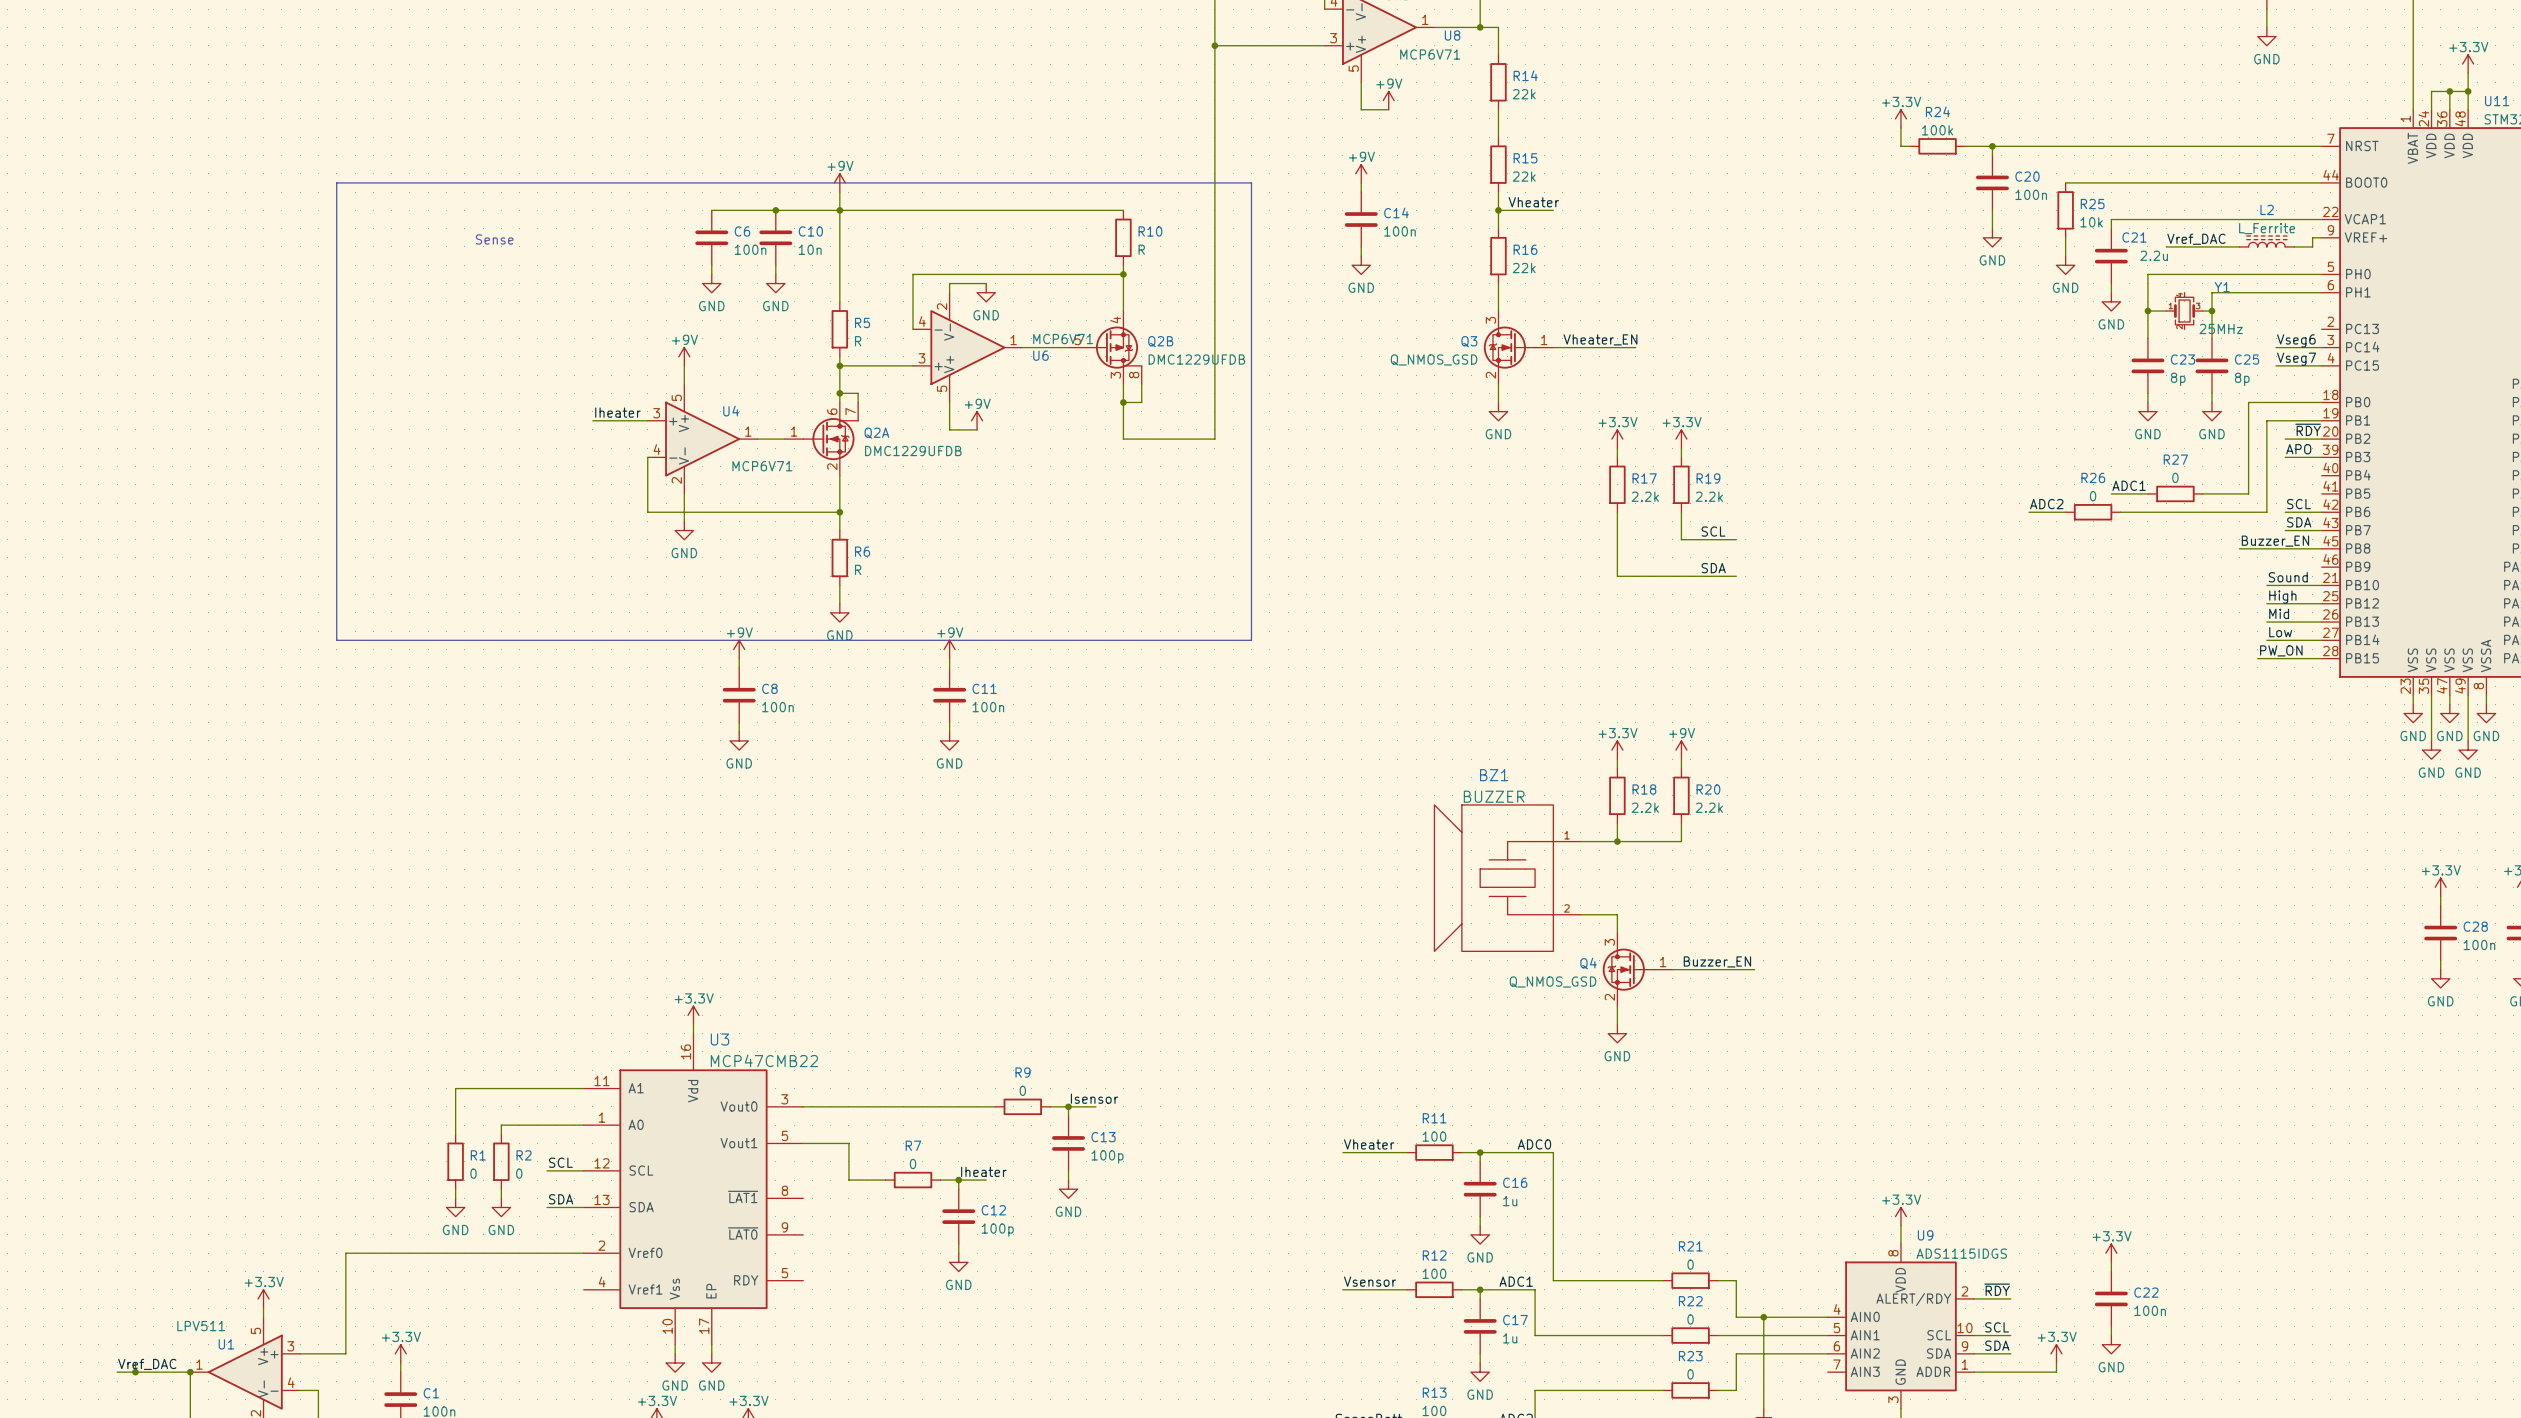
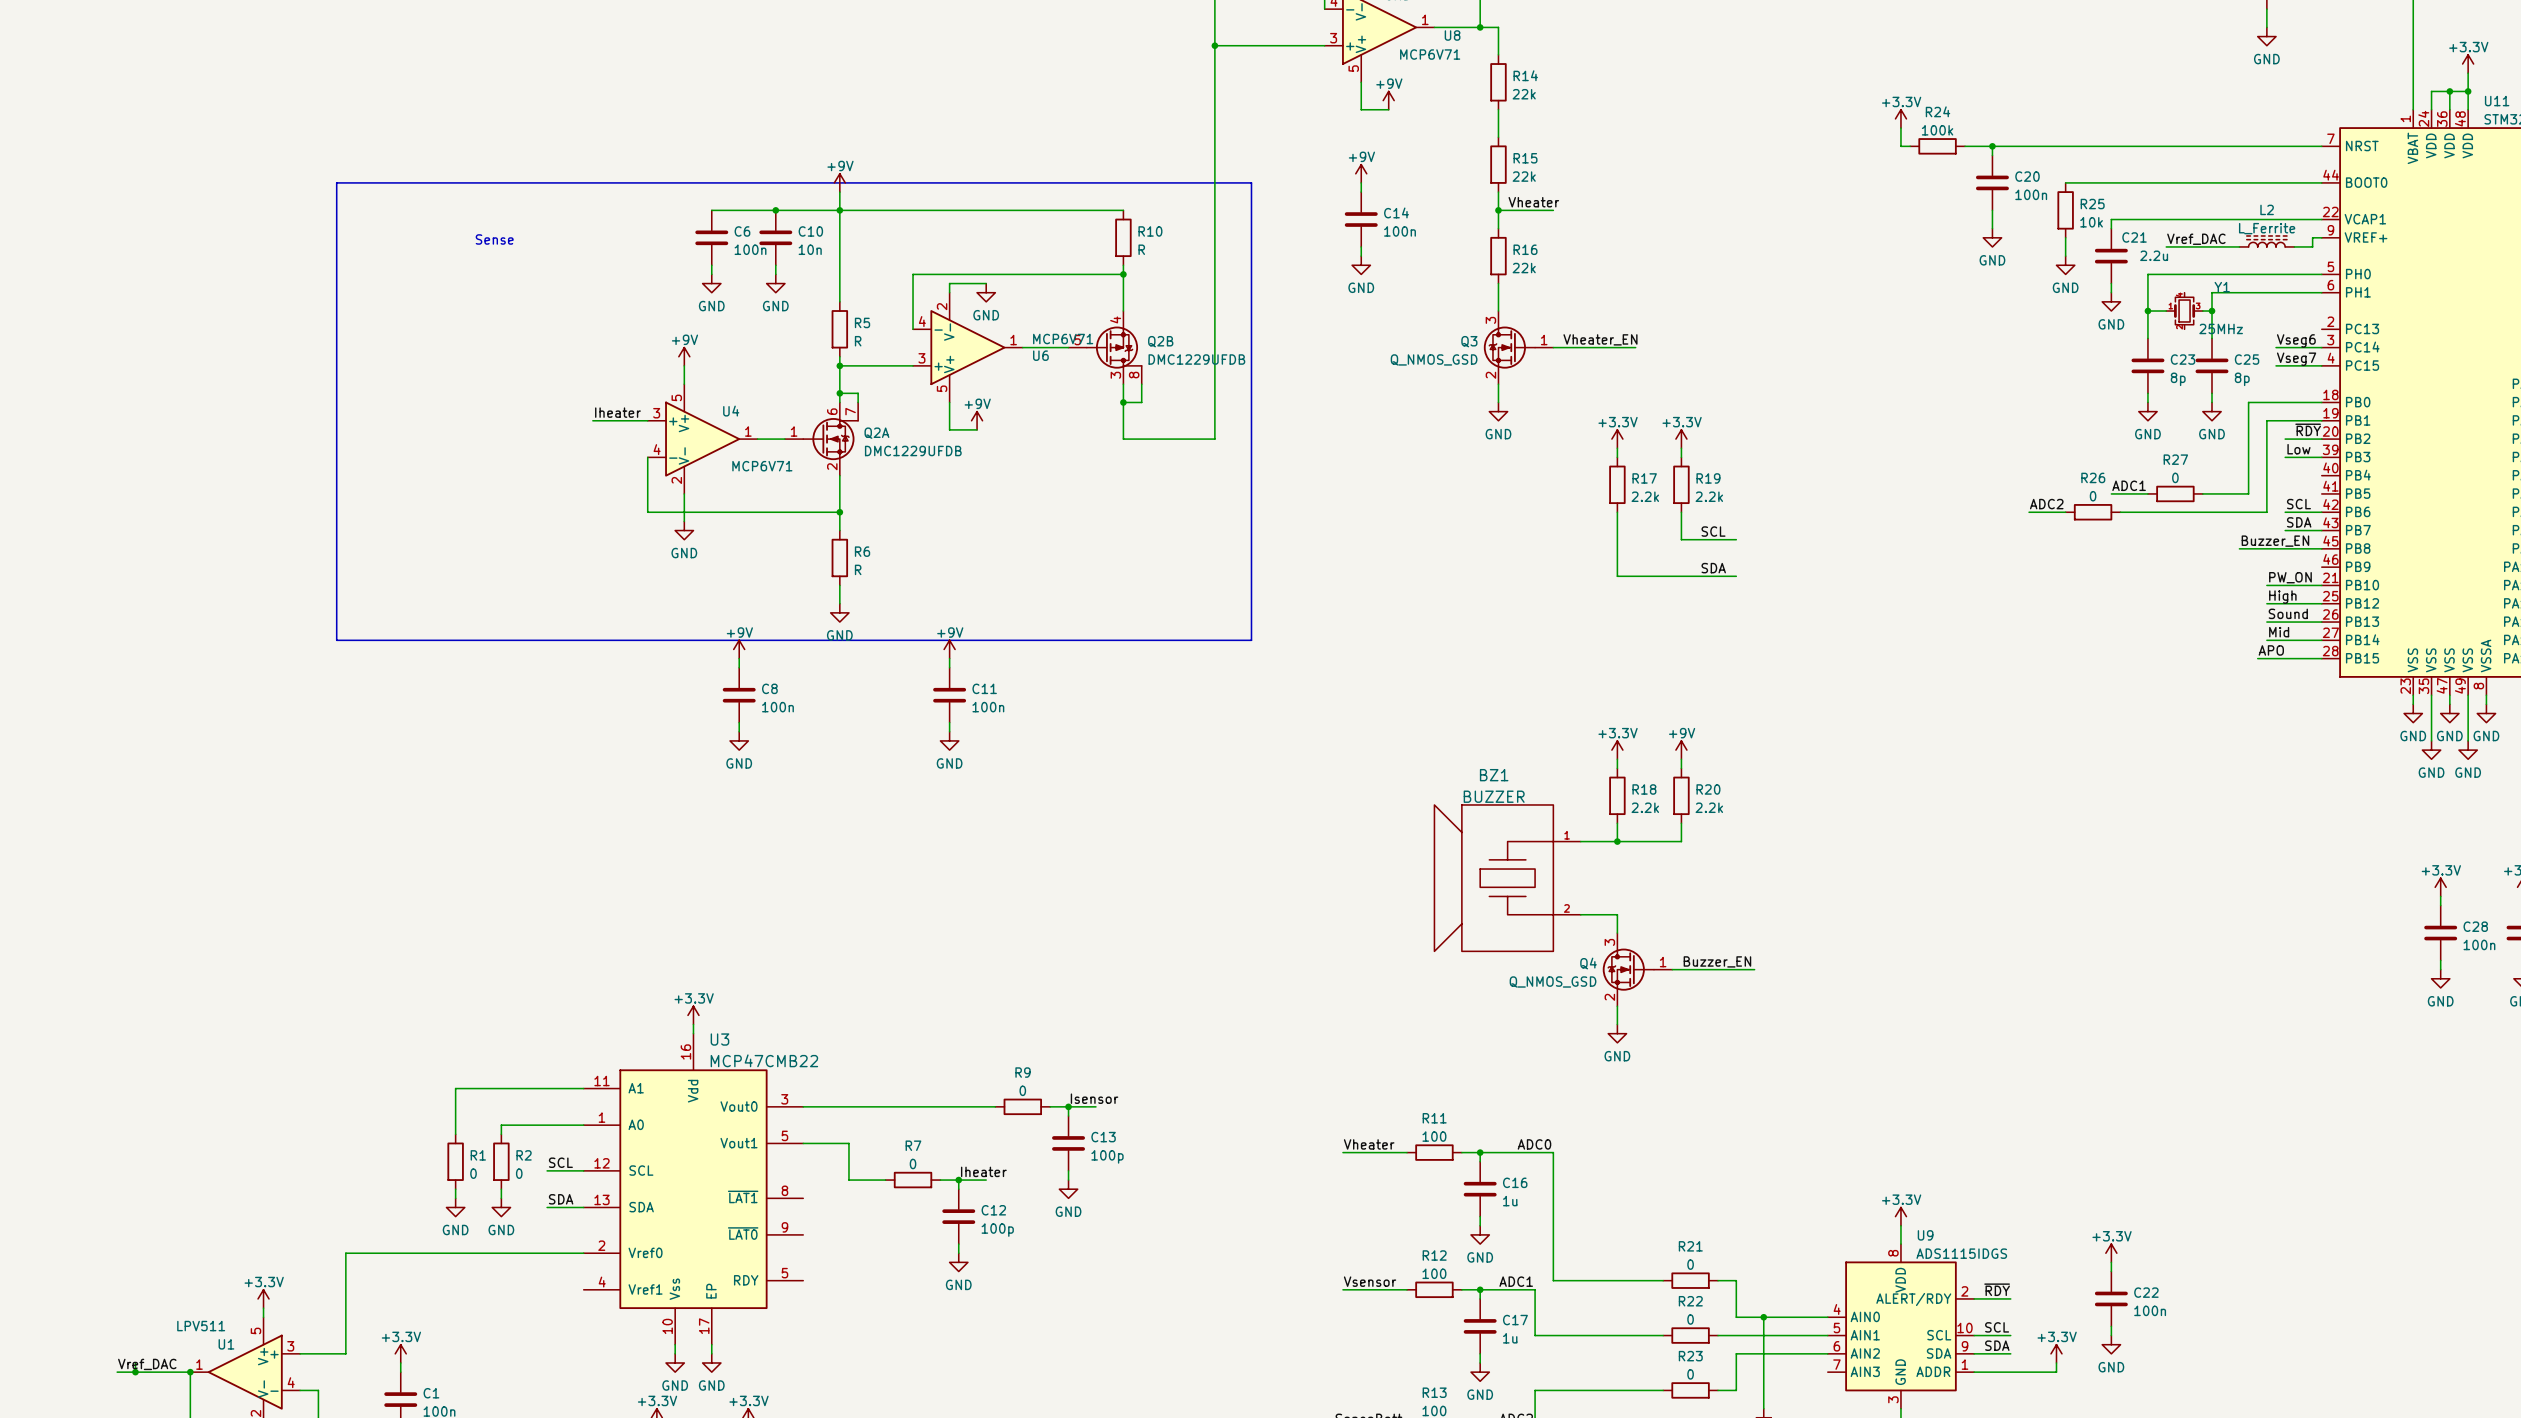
label: APO (2298, 449) -> Low (2298, 449)
label: Sound (2288, 577) -> PW_ON (2290, 577)
label: Mid (2279, 613) -> Sound (2288, 613)
label: Low (2280, 632) -> Mid (2279, 632)
label: PW_ON (2281, 650) -> APO (2271, 650)

